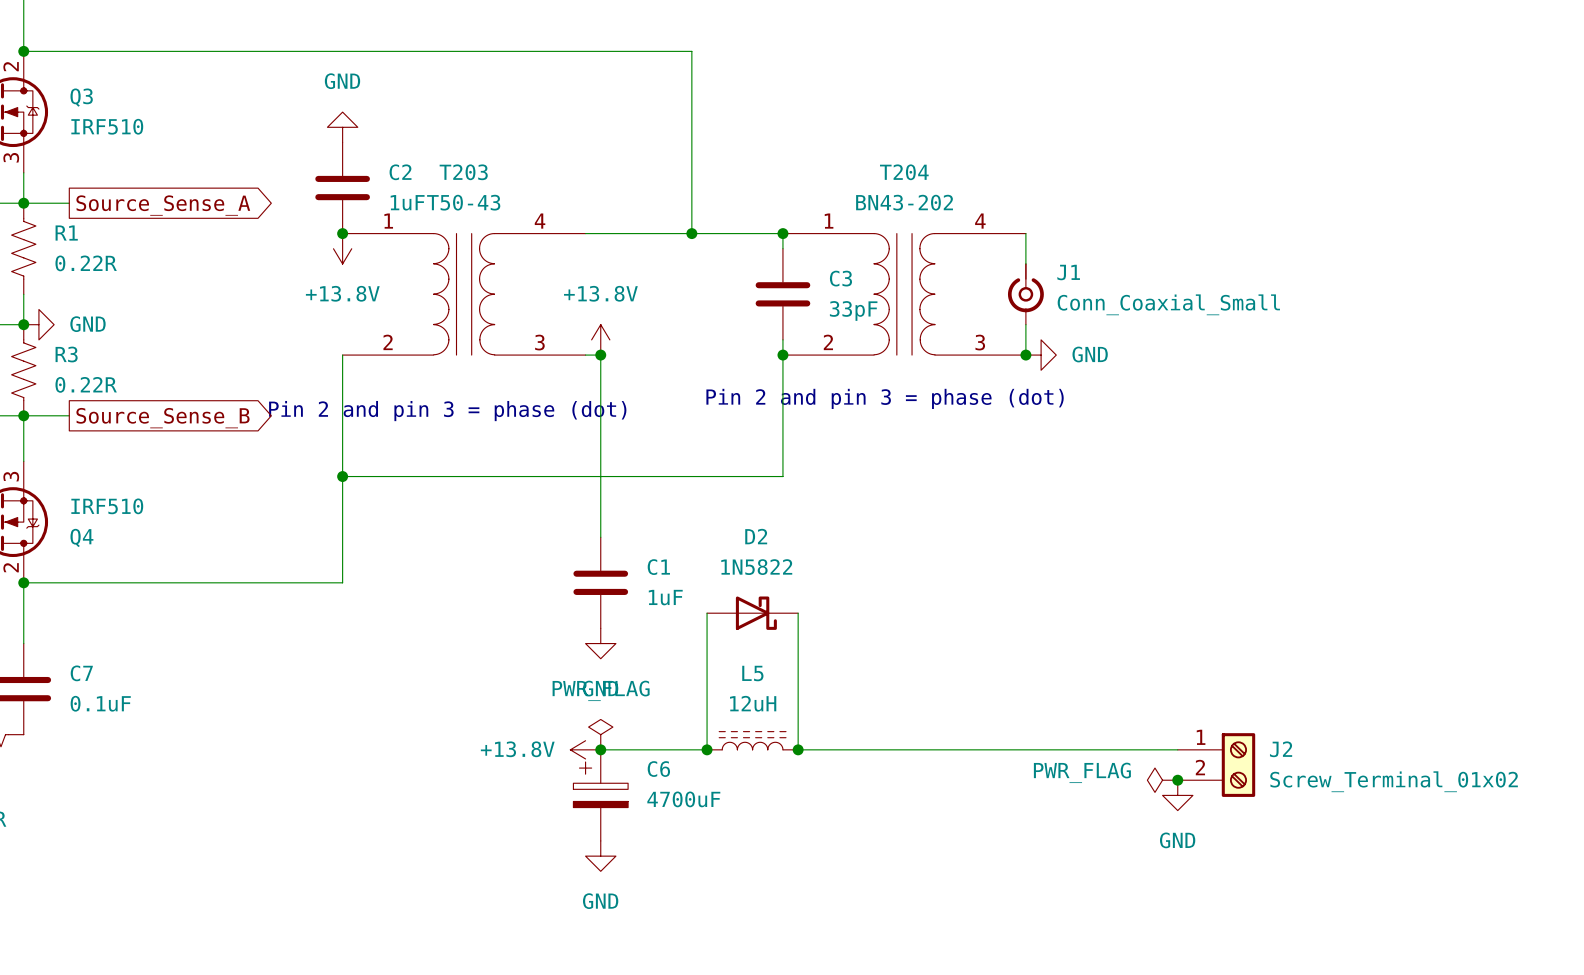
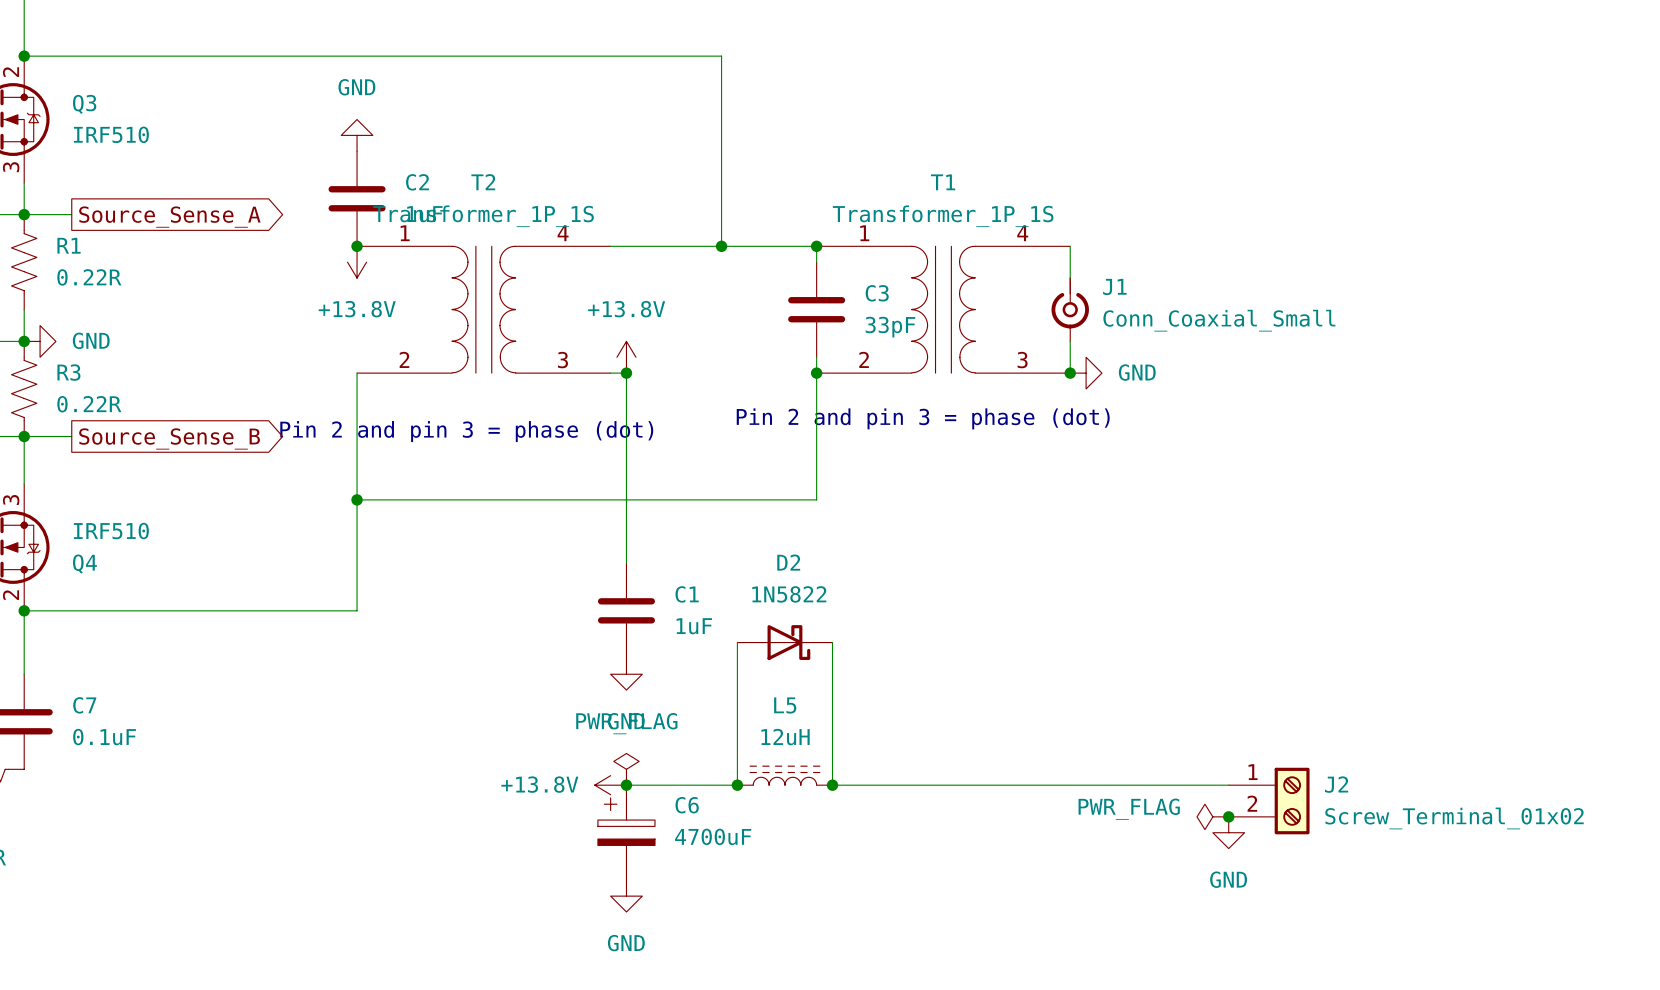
T203 name: T203 (463, 172) -> T2 (483, 182)
T204 name: T204 (904, 172) -> T1 (943, 182)
T203 value: T50-43 (463, 202) -> Transformer_1P_1S (483, 216)
T204 value: BN43-202 (904, 202) -> Transformer_1P_1S (943, 216)

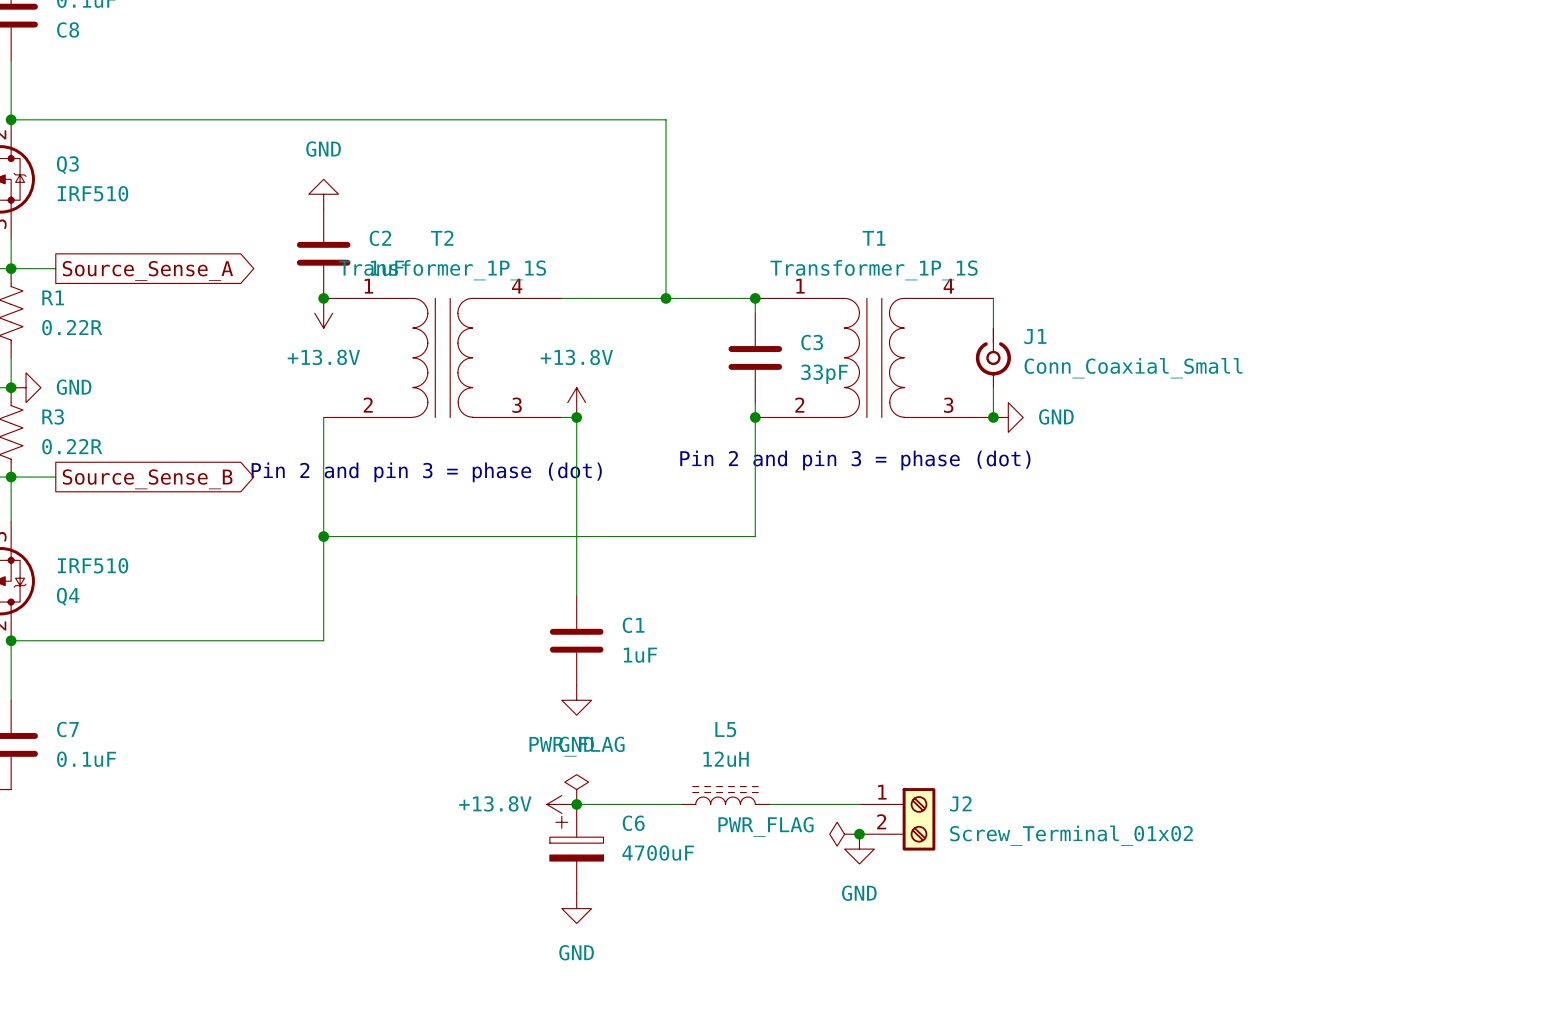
wire: (737, 642) (737, 785) -> none
D2: 1N5822 (784, 642) -> none
wire: (832, 642) (832, 785) -> none
junction: (737, 785) -> none
junction: (832, 785) -> none
wire: (927, 785) (1228, 785) -> none
J2 position: (1269, 801) -> (897, 819)
junction: none -> (859, 834)
power symbol position: PWR_FLAG (1212, 816) -> PWR_FLAG (844, 834)
junction: (1228, 816) -> none
power symbol position: GND (1228, 832) -> GND (859, 849)

